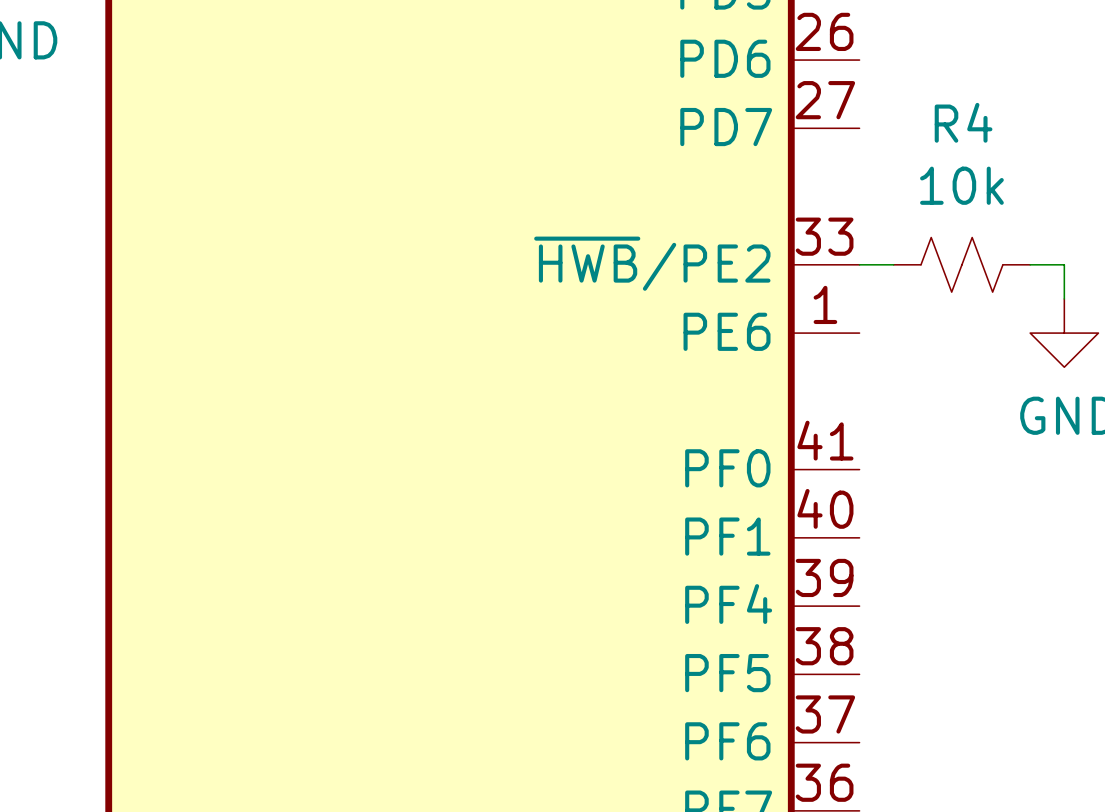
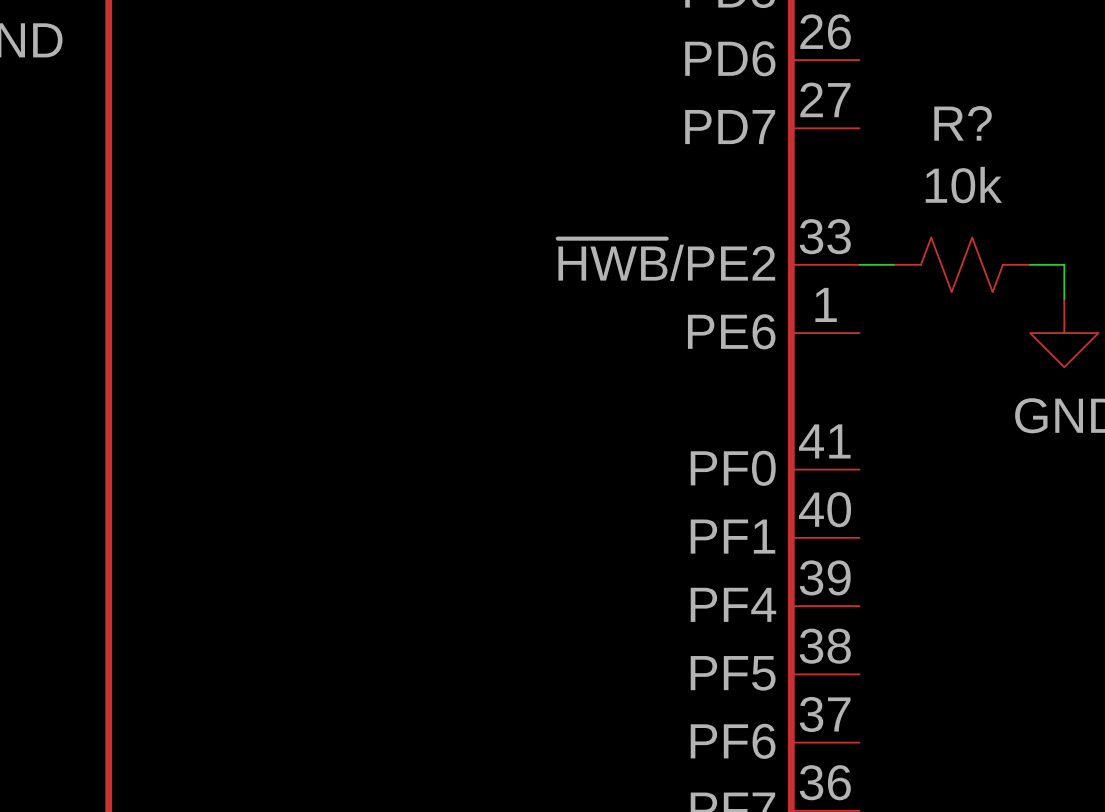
R4 name: R4 (963, 122) -> R? (963, 123)

